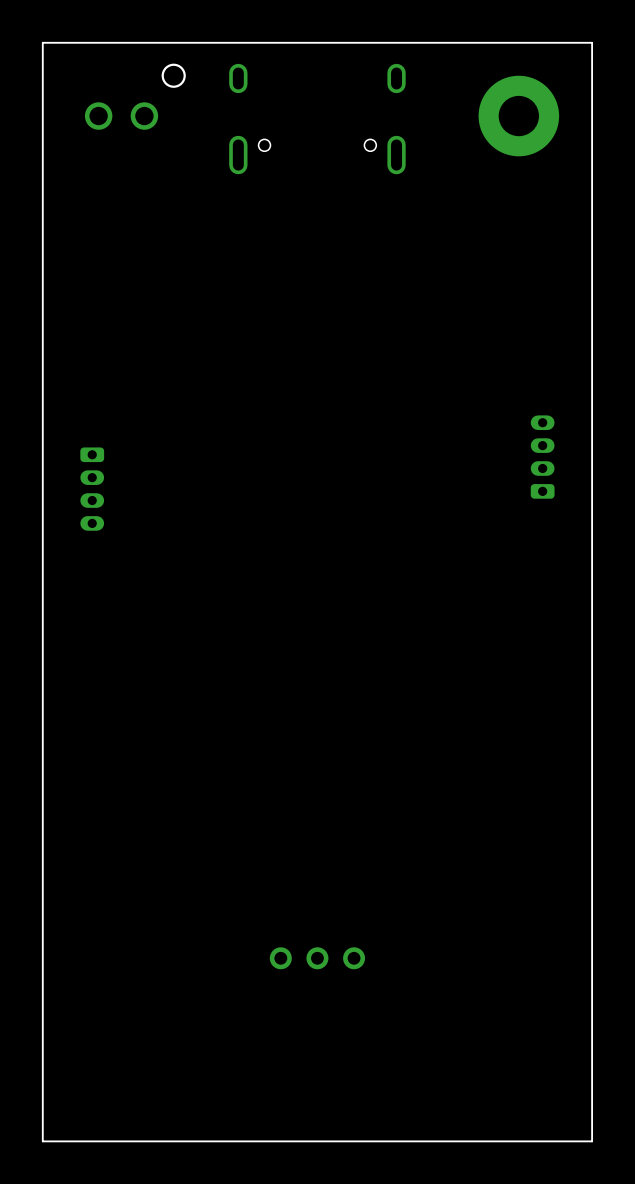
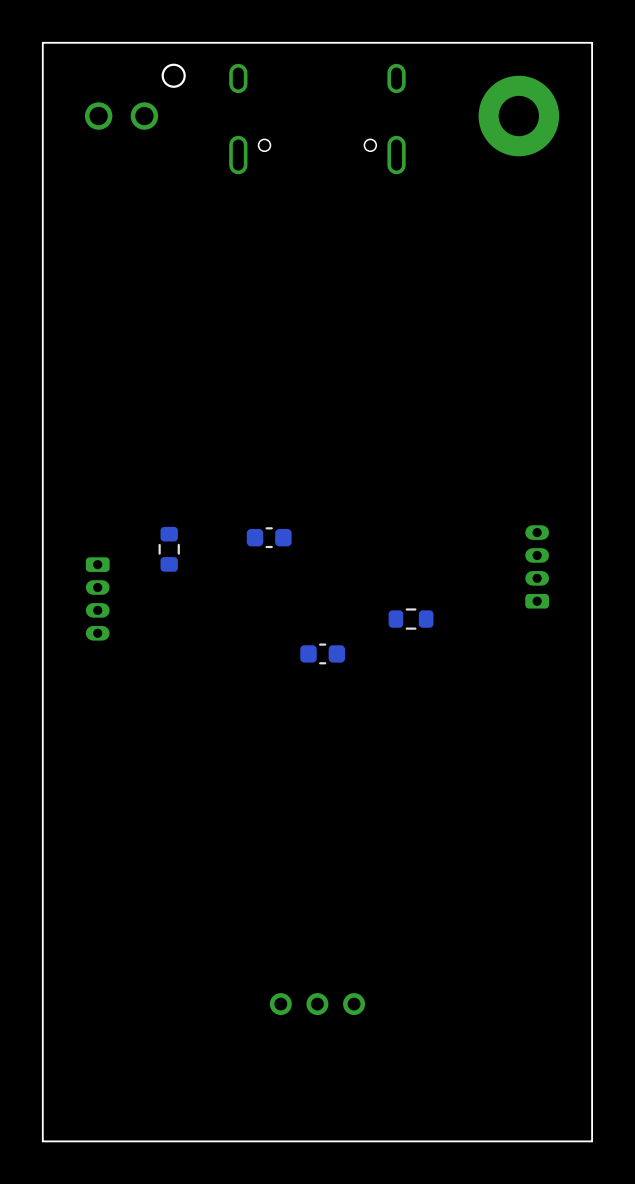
part position: (542, 457) -> (537, 566)
part position: (92, 489) -> (97, 598)
part: none -> (269, 537)
part: none -> (169, 549)
part: none -> (411, 619)
part: none -> (322, 653)
part position: (317, 958) -> (317, 1004)

